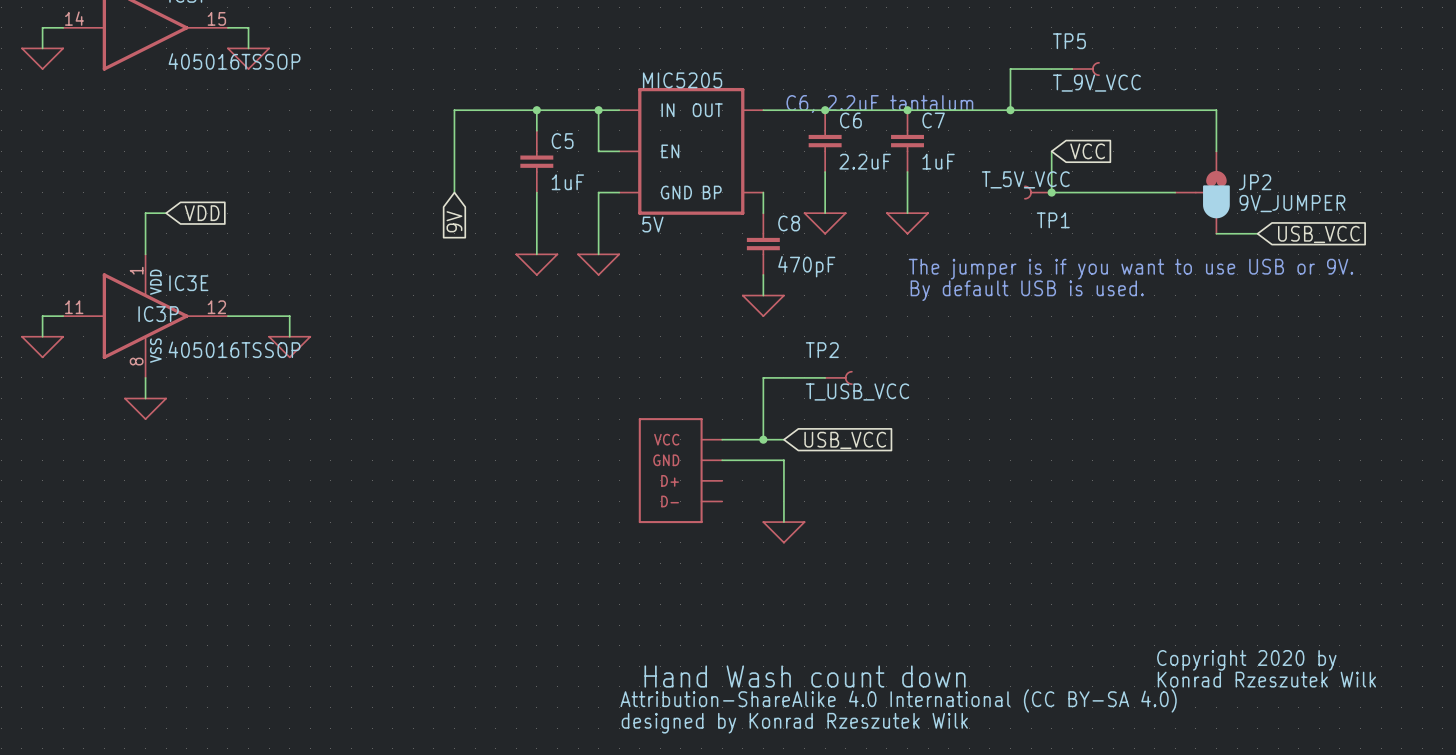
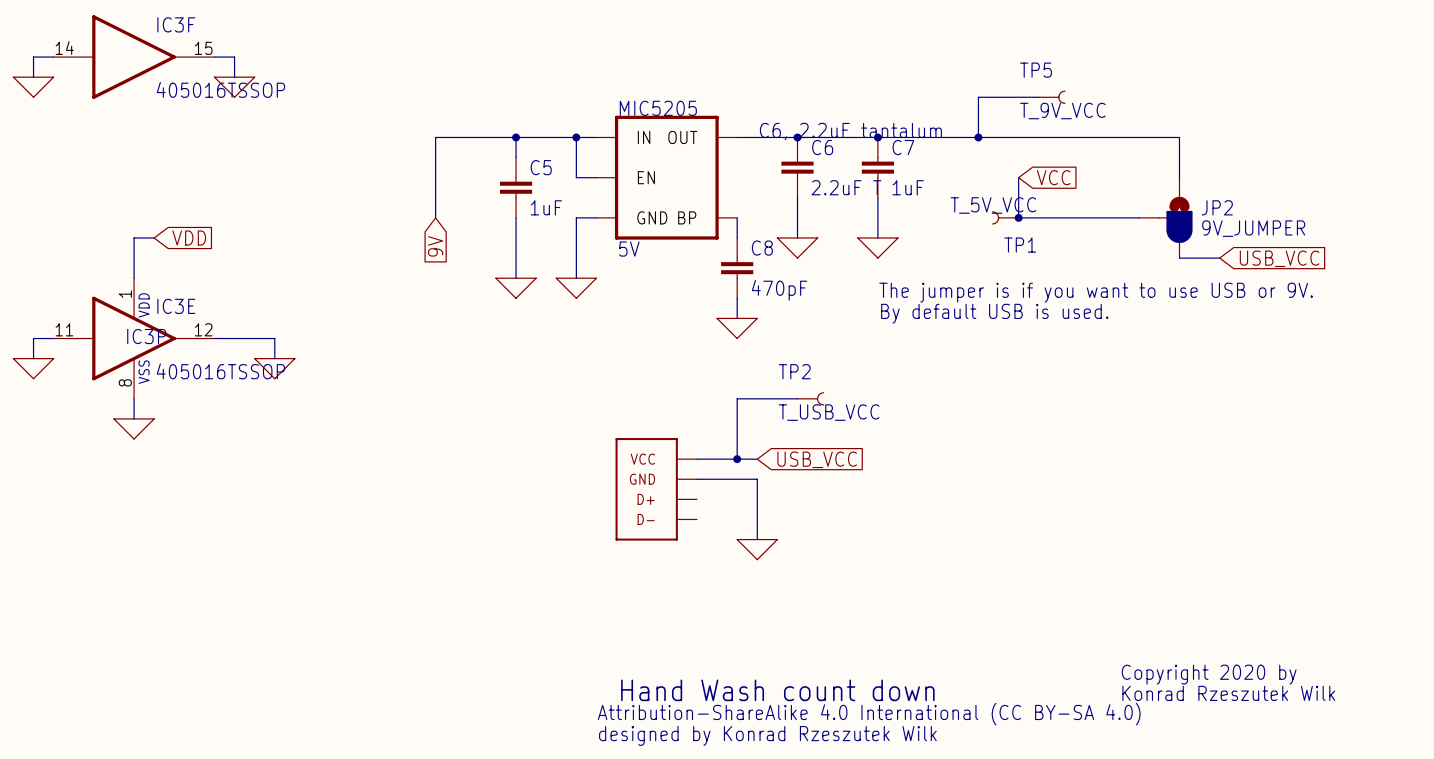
C6 value: 2.2uF (865, 161) -> 2.2uF T (846, 187)

